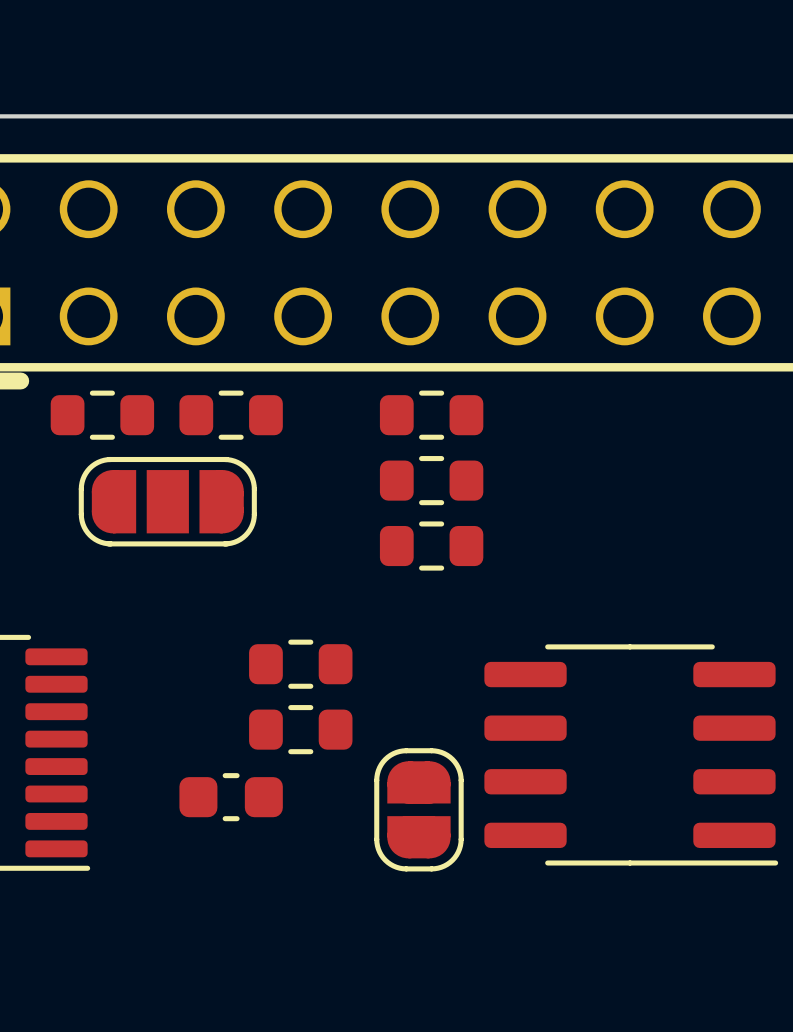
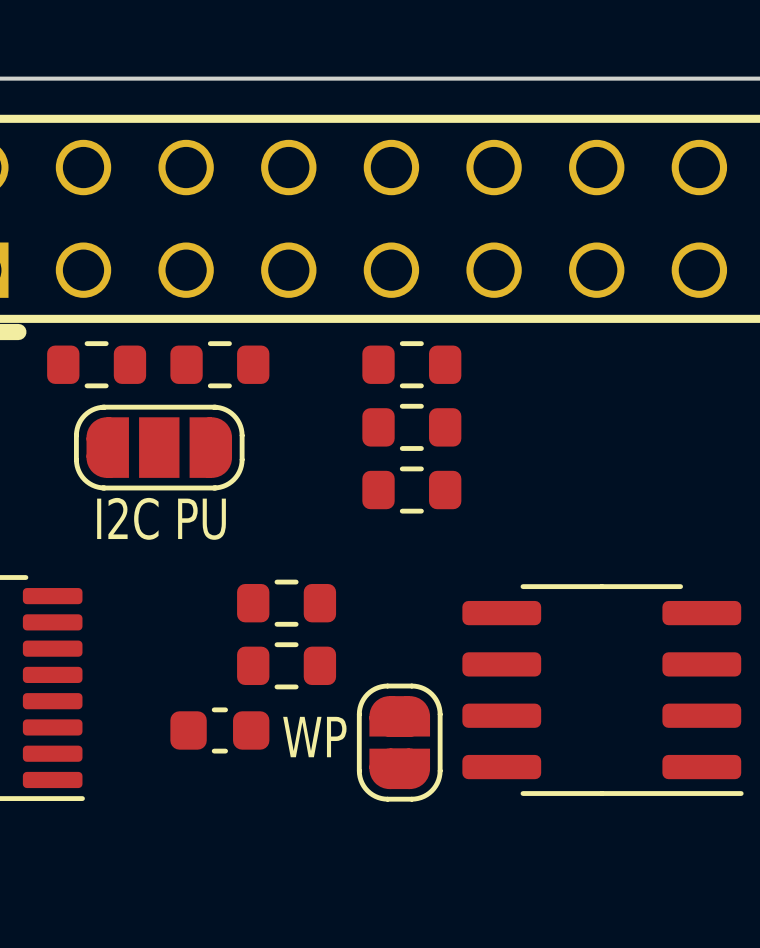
text: none -> I2C PU (161, 518)
text: none -> WP (314, 737)

